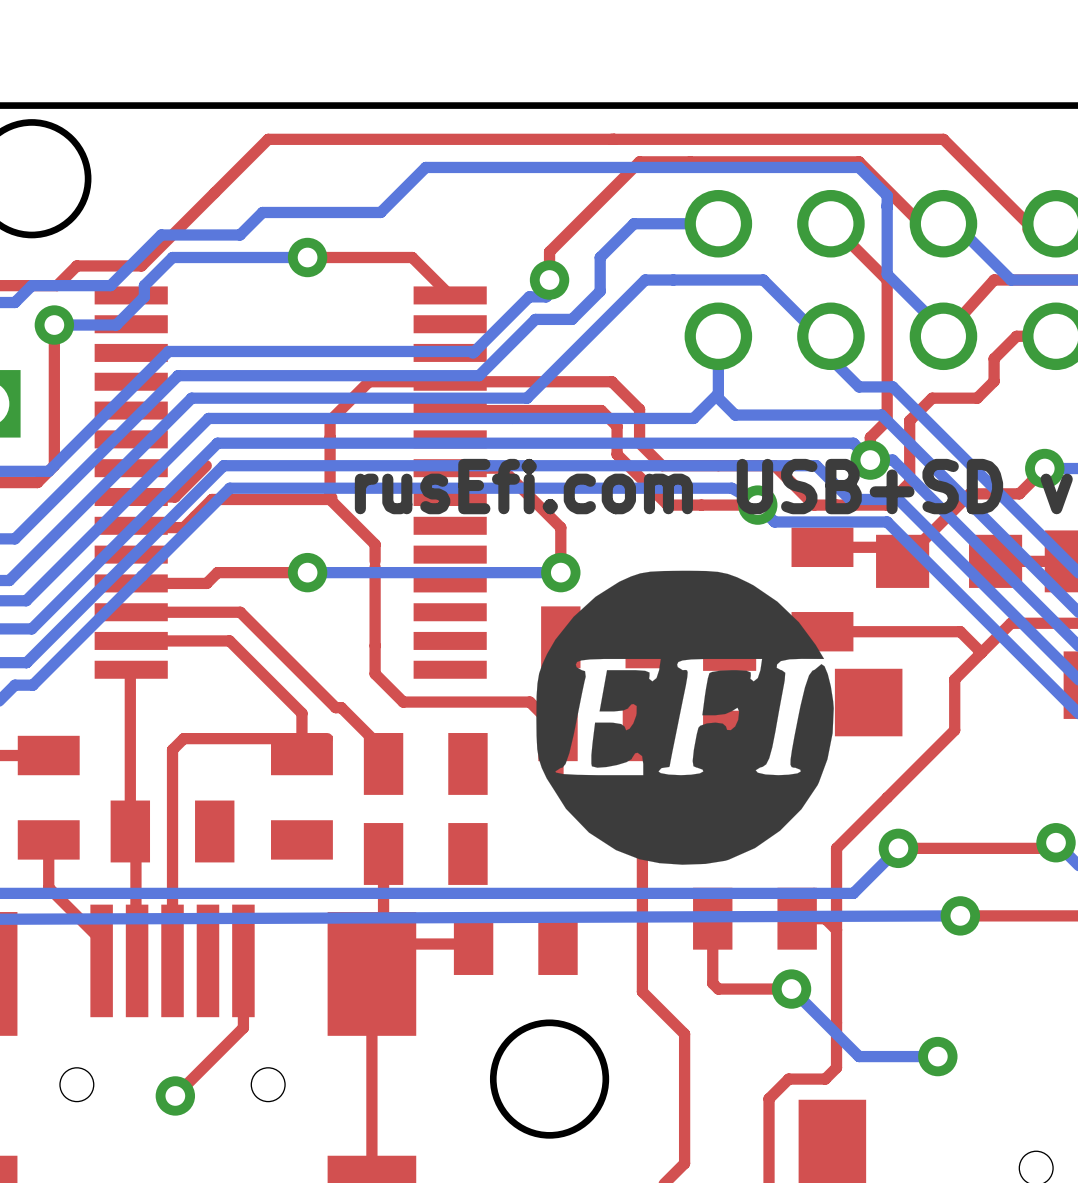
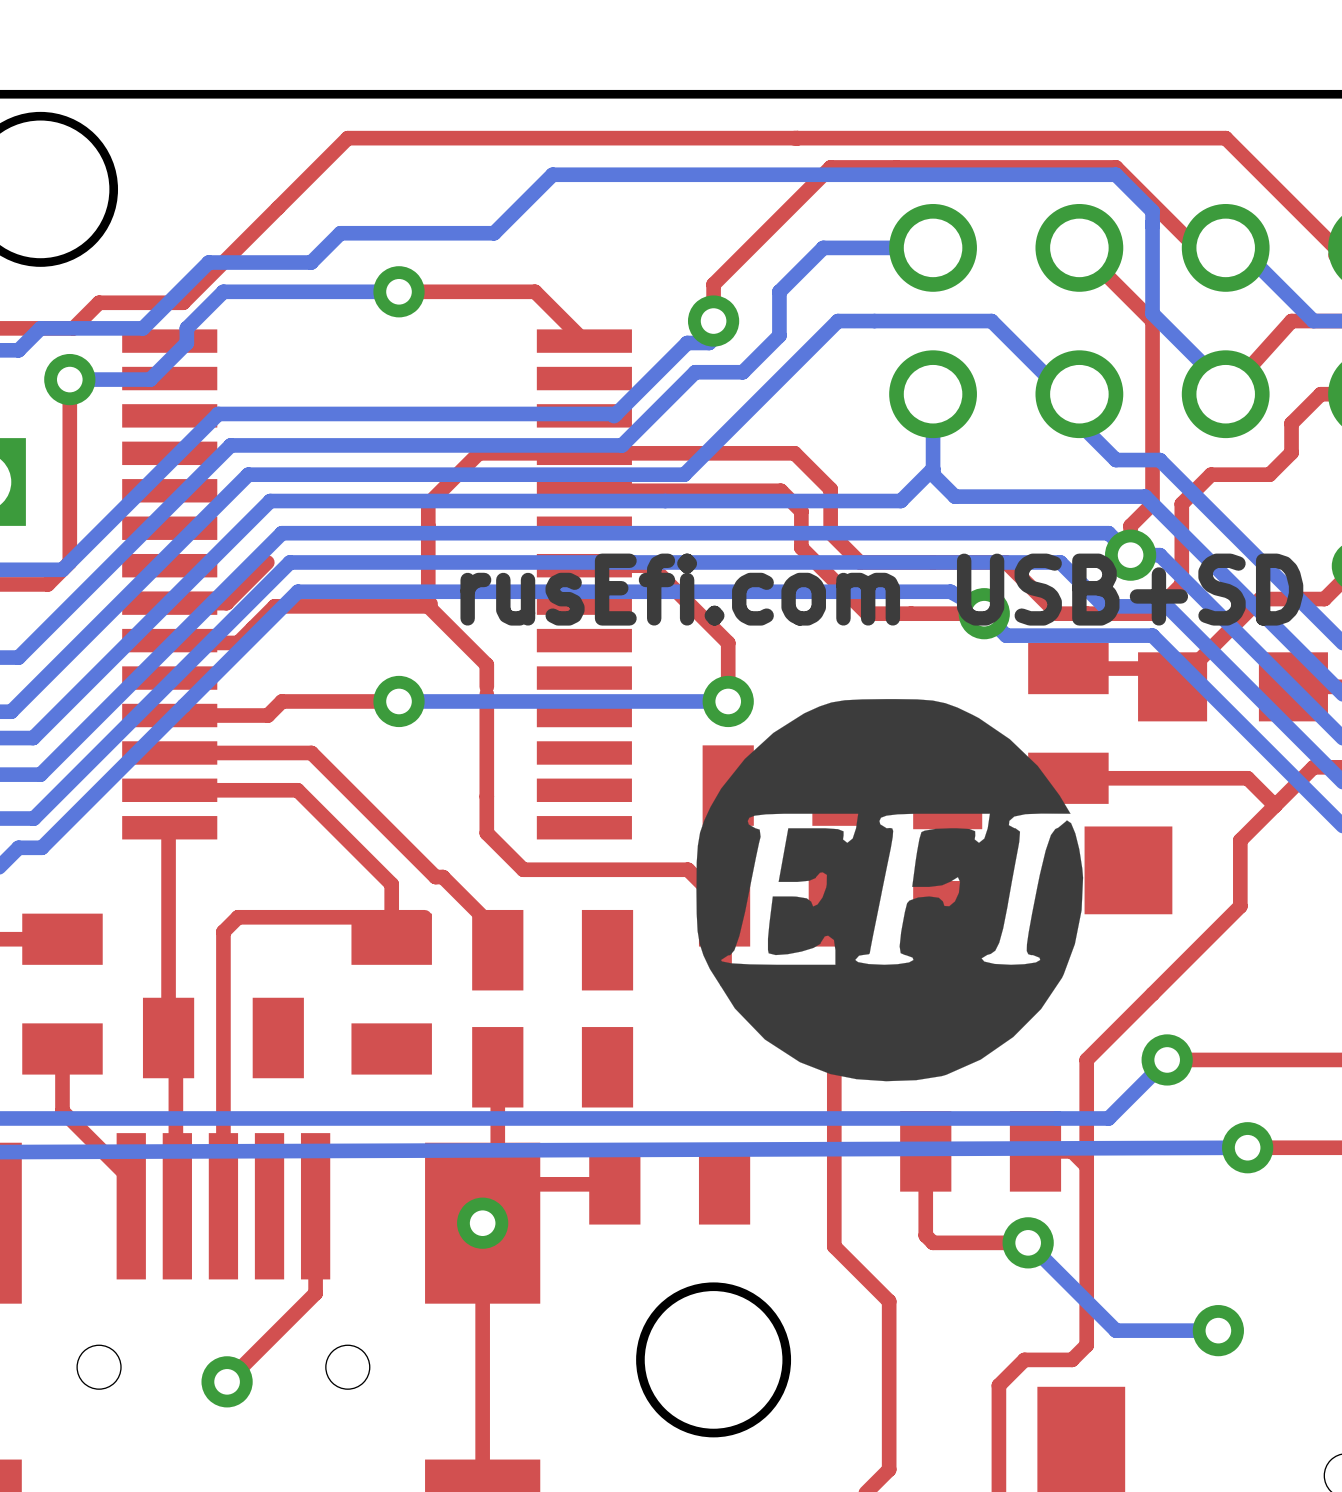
via: none -> (482, 1223)

